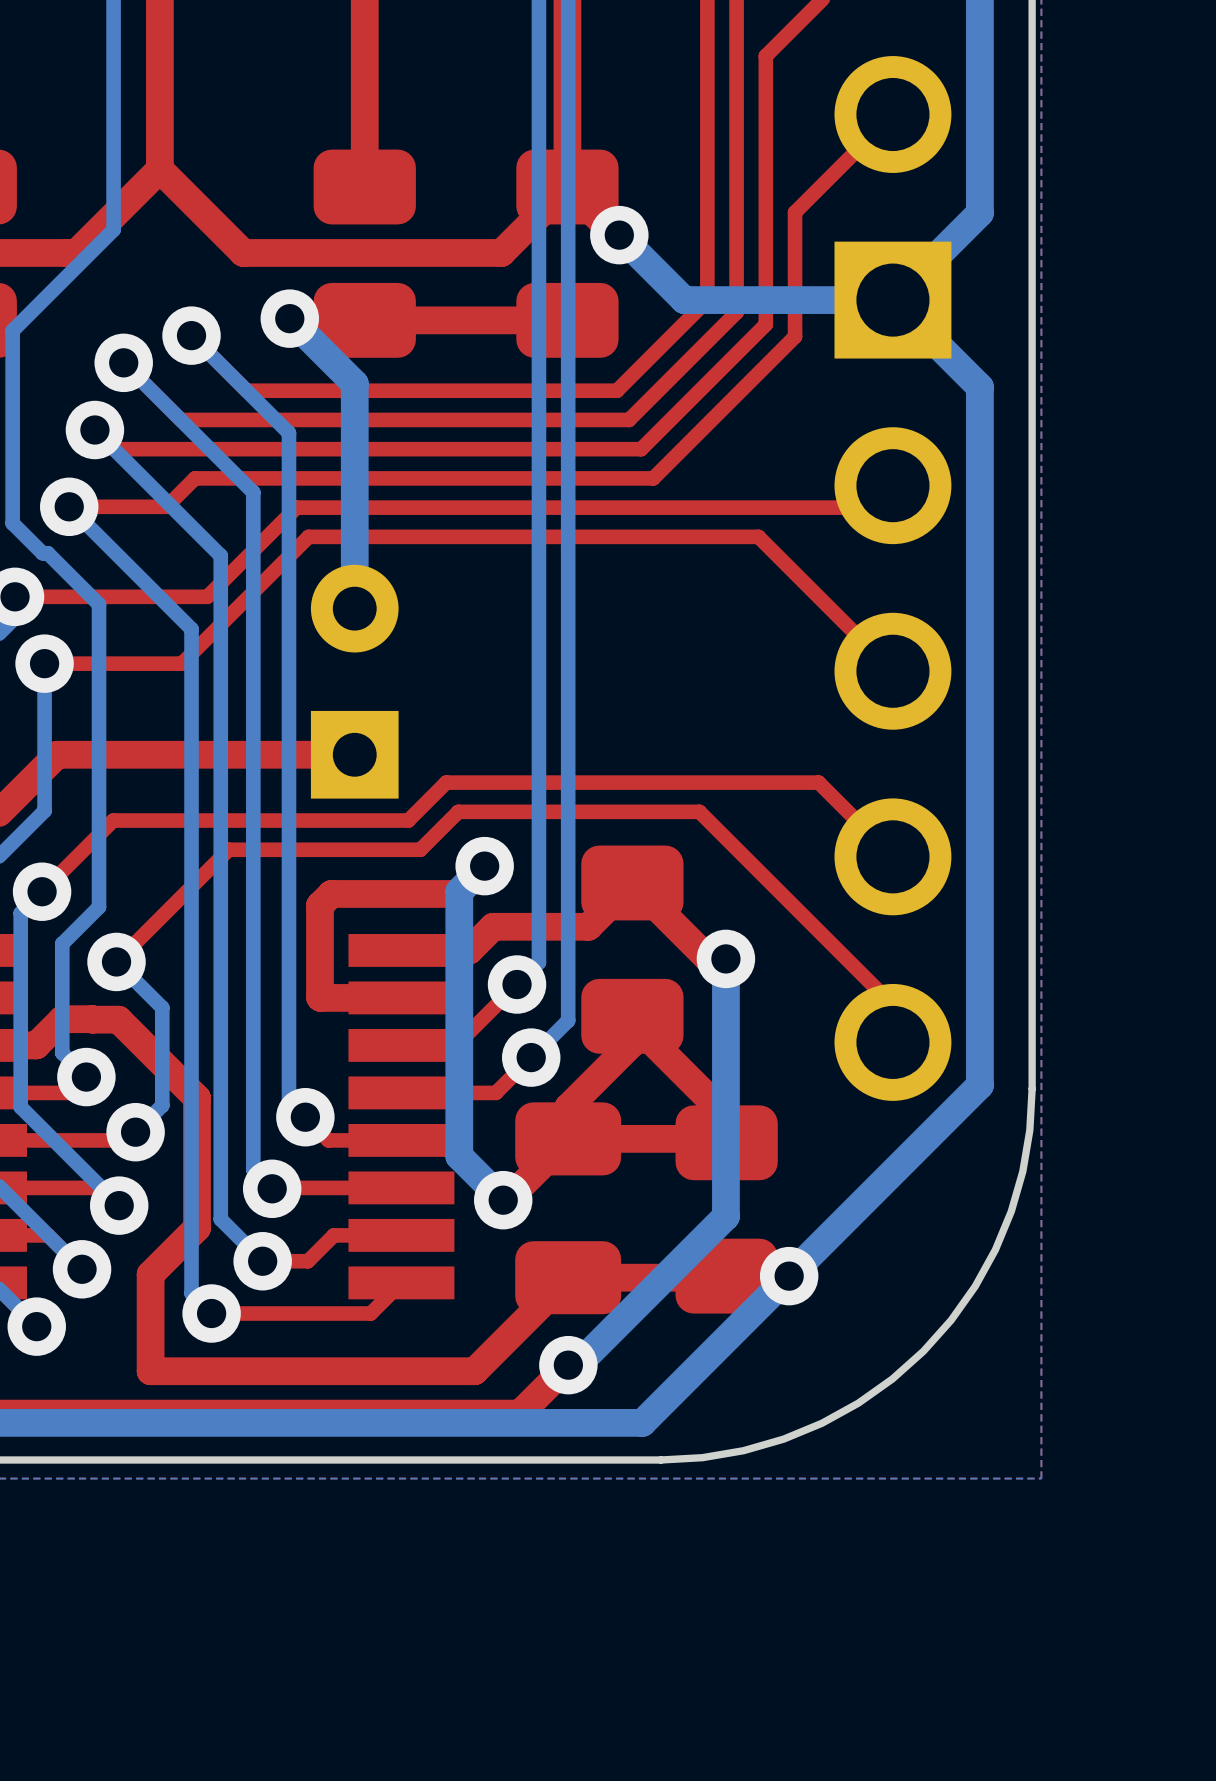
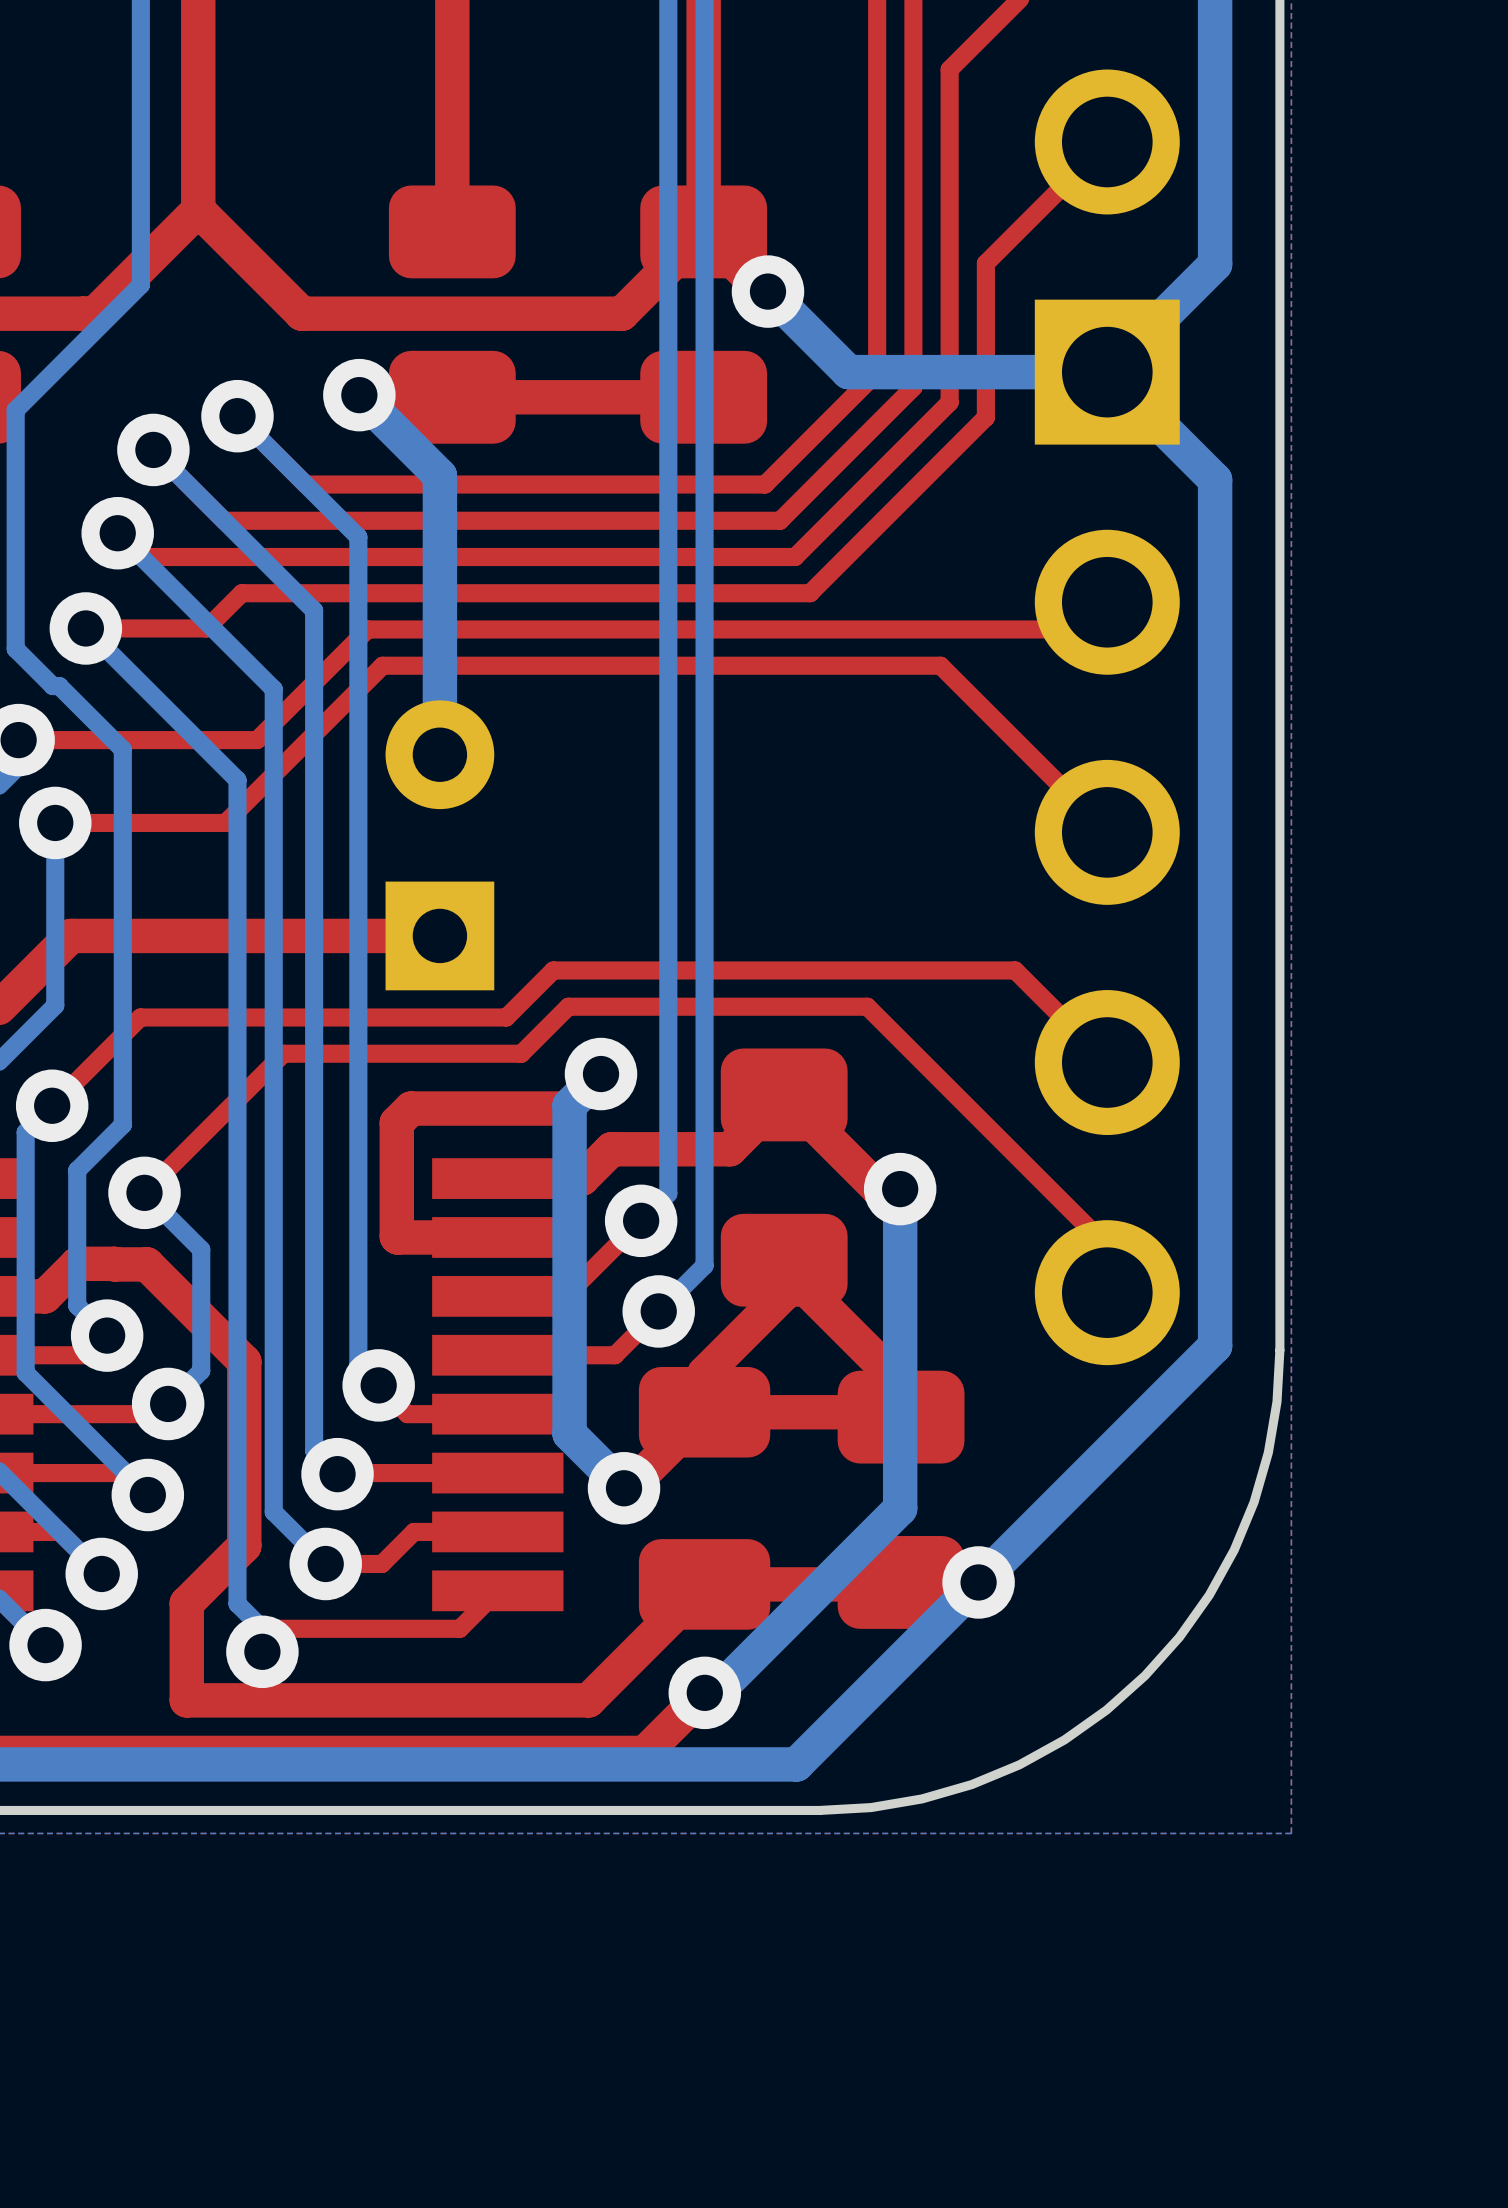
top track: (197, 1228) (150, 1274) (150, 1292) -> (244, 1522) (244, 1545) (186, 1603)
via position: (211, 1313) -> (262, 1651)

